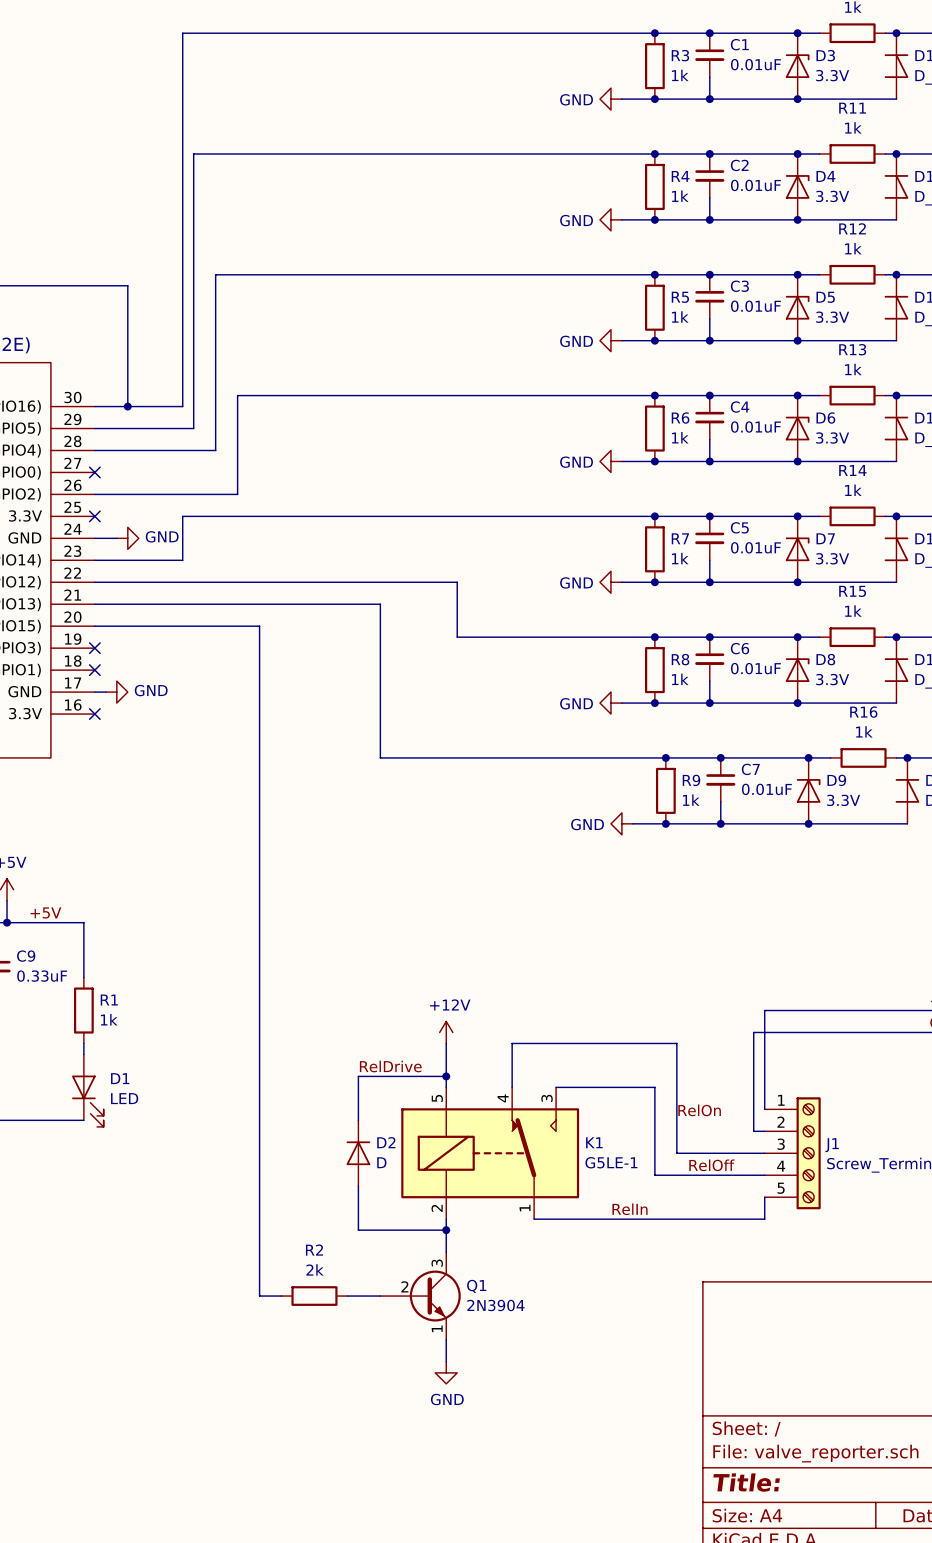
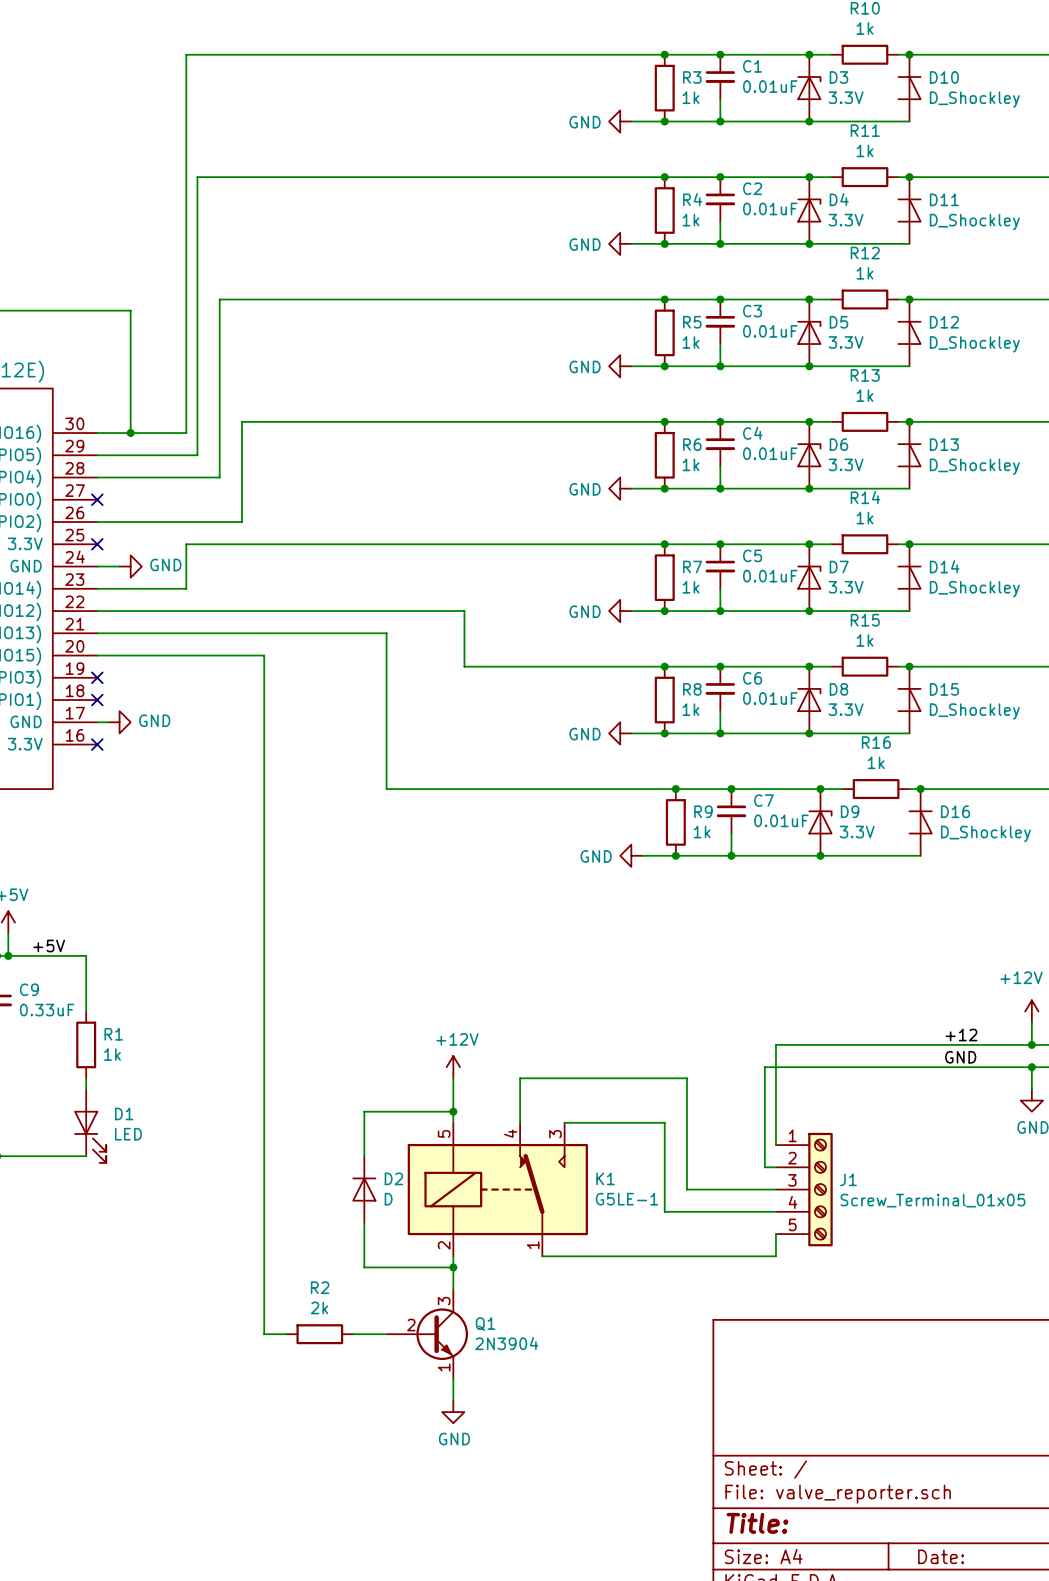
label: RelDrive (390, 1066) -> none
label: RelOn (699, 1110) -> none
label: RelOff (711, 1165) -> none
label: RelIn (630, 1209) -> none

